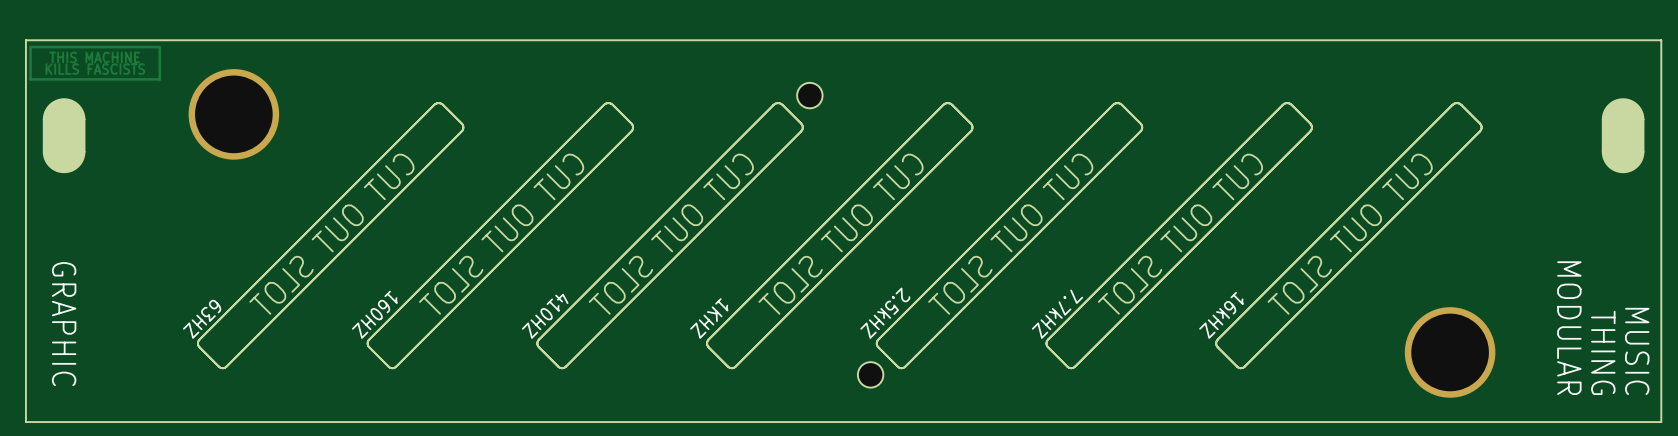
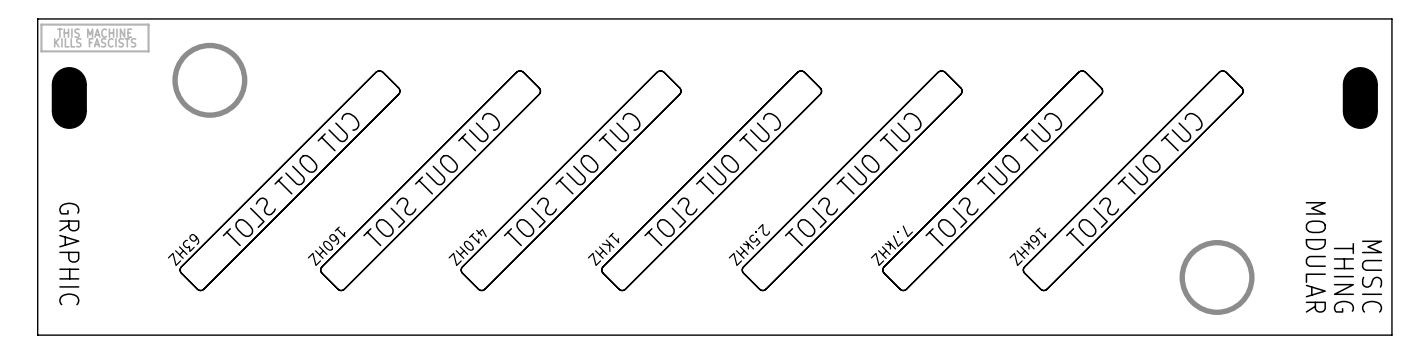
hole: (809, 95) -> none
hole: (870, 374) -> none

